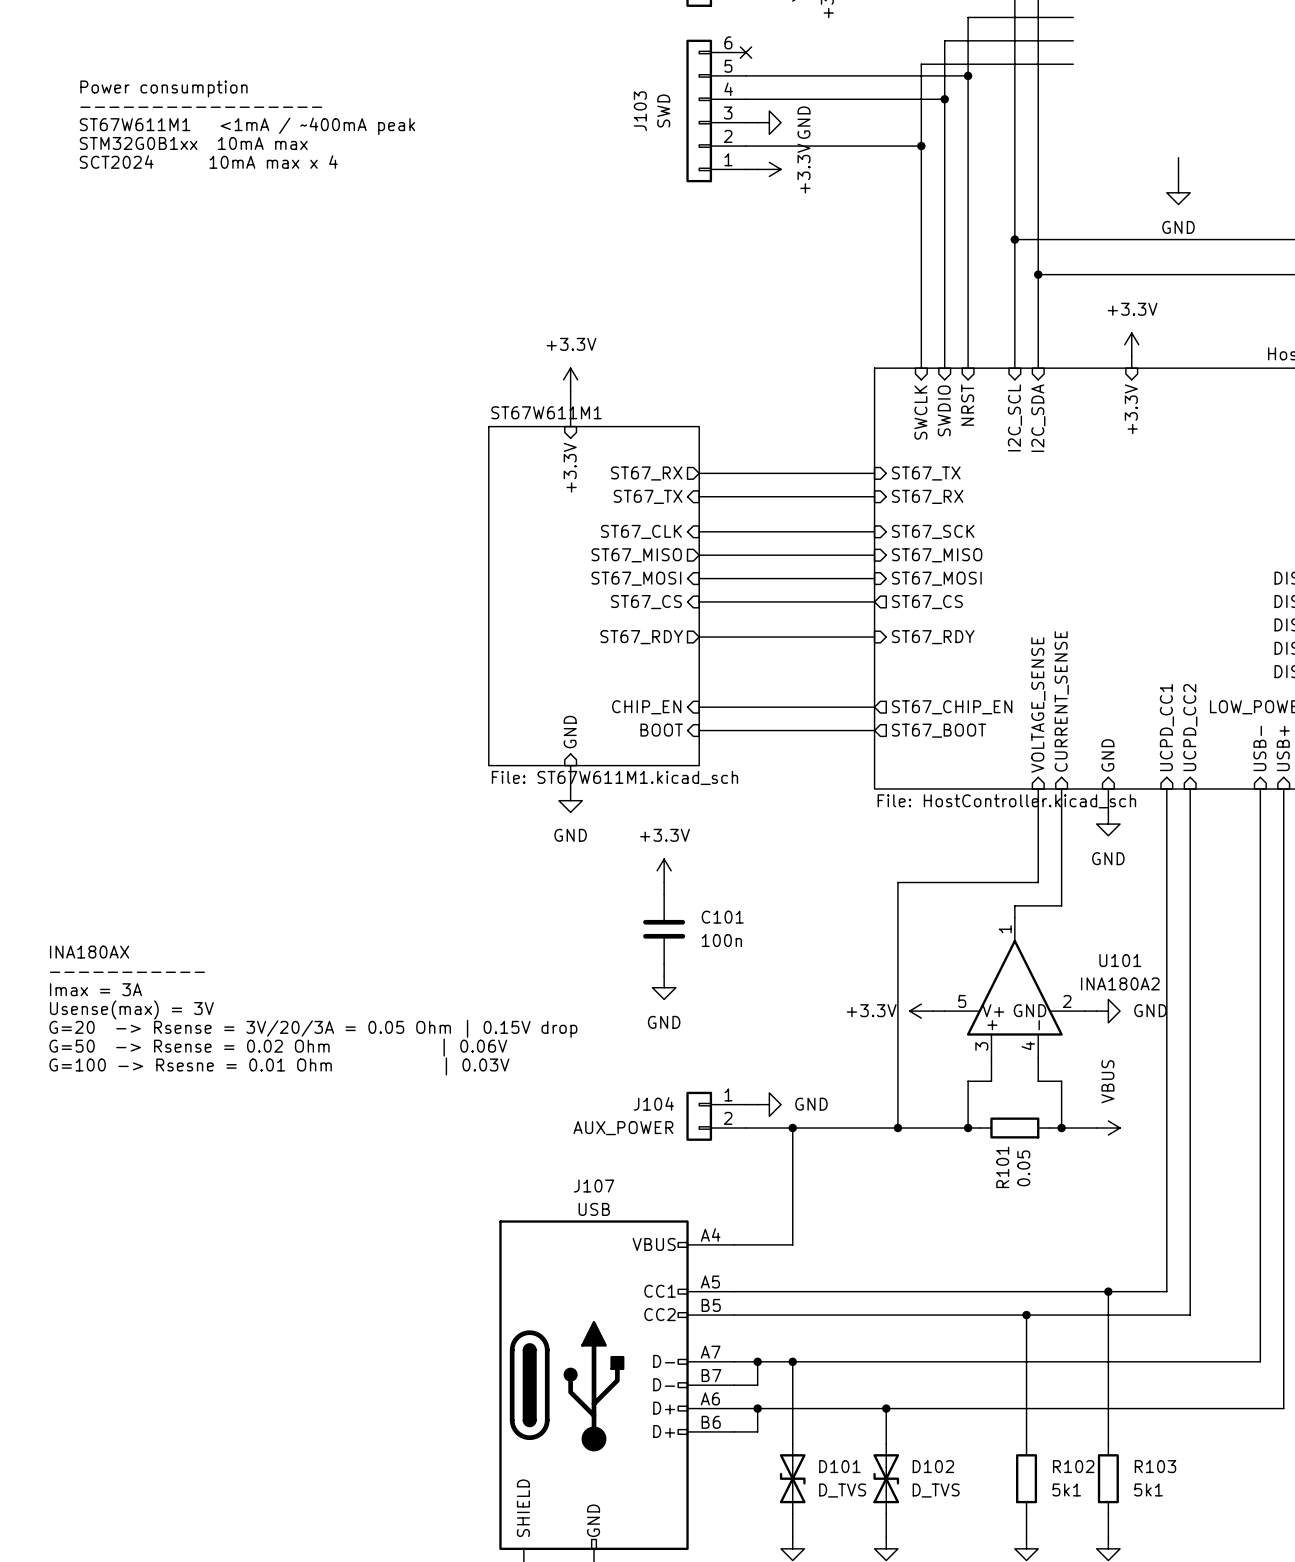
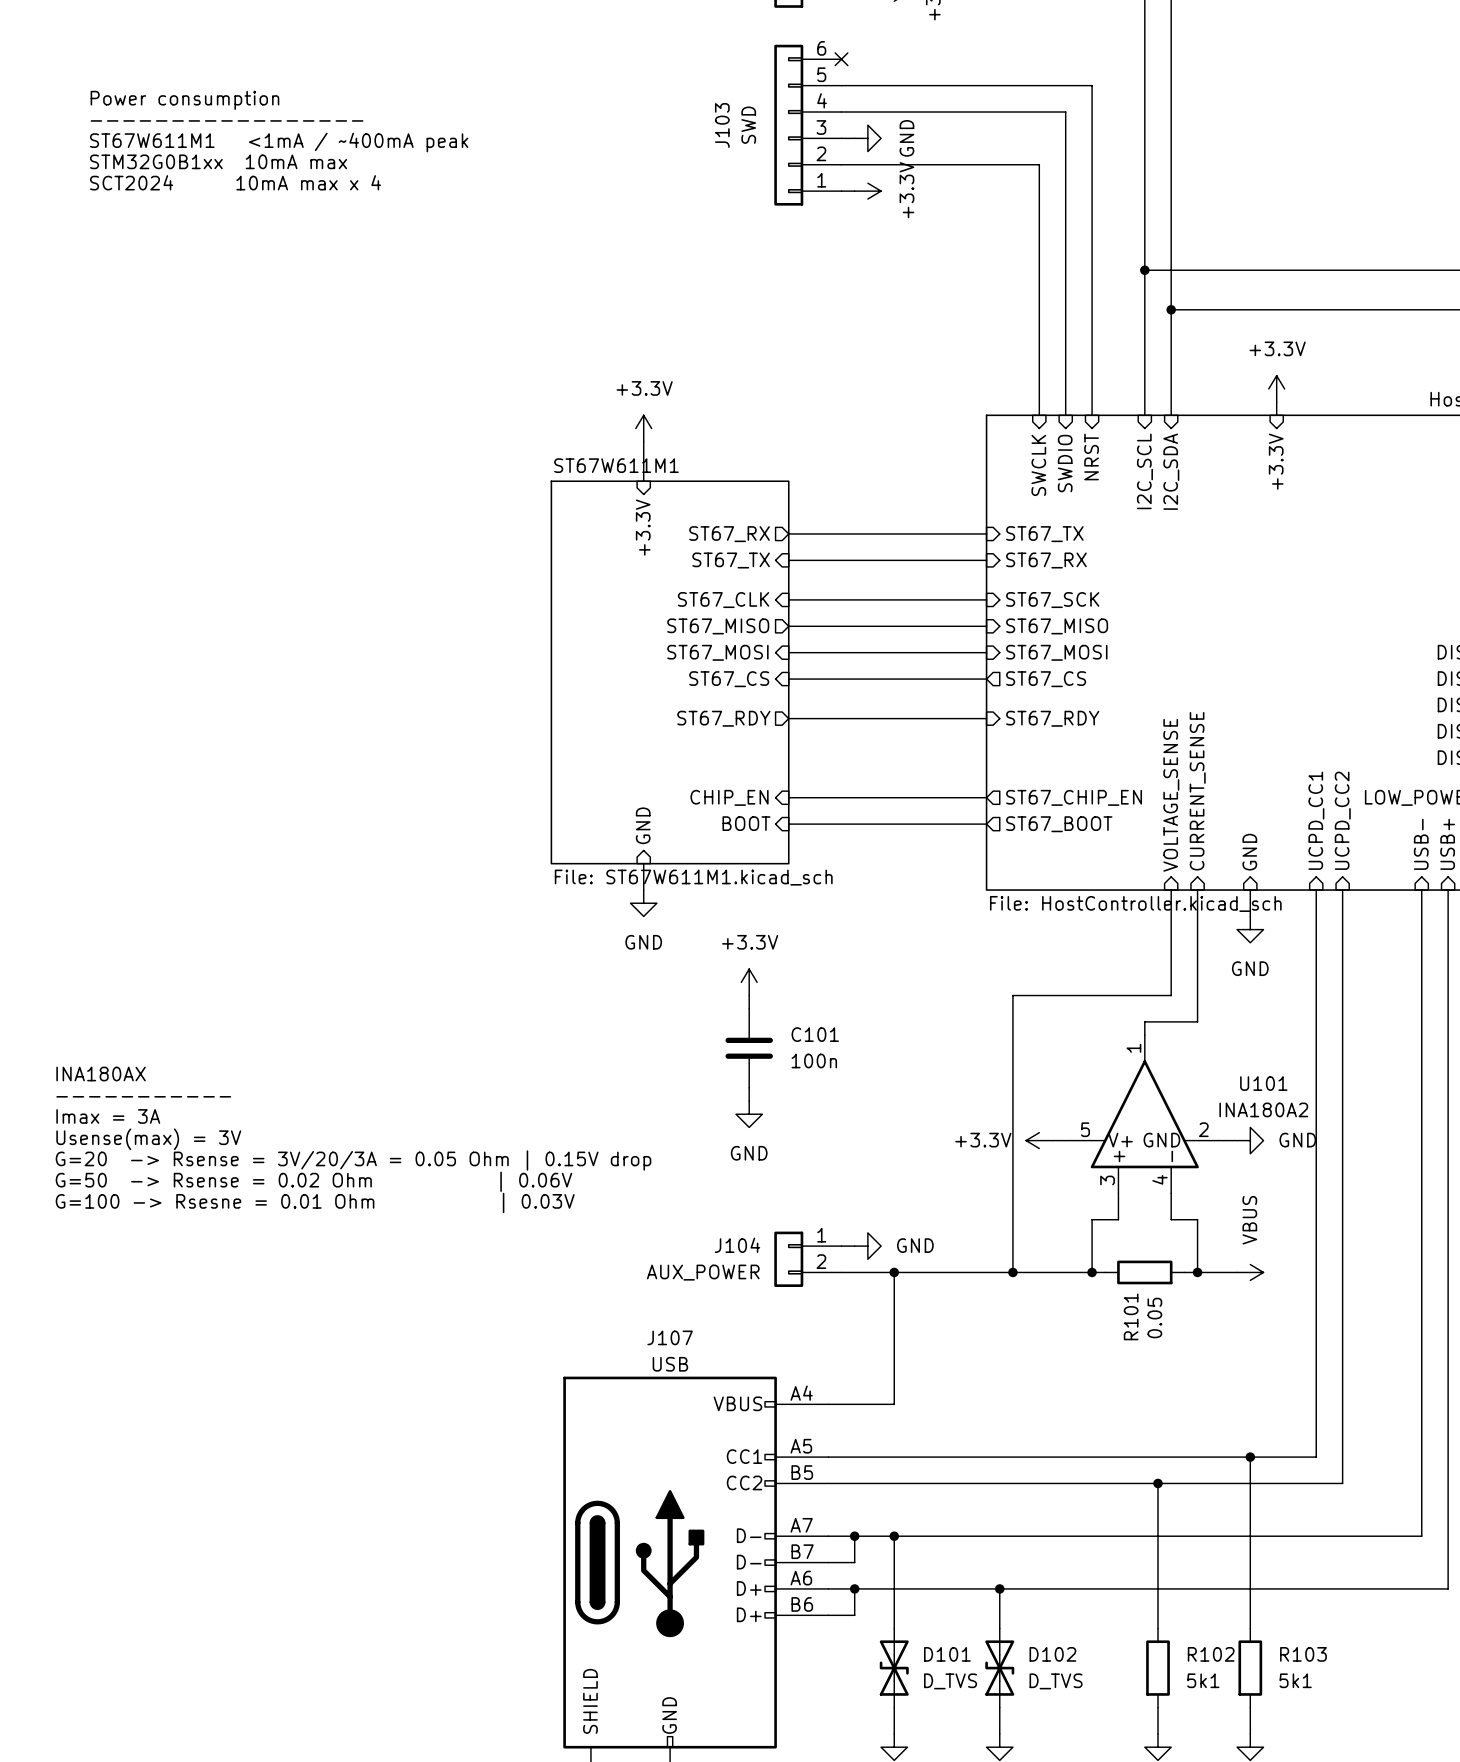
wire: (1073, 17) (968, 17) (968, 75) -> none
wire: (1073, 40) (944, 40) (944, 99) -> none
wire: (1073, 64) (921, 64) (921, 146) -> none
junction: (968, 75) -> none
junction: (944, 99) -> none
junction: (921, 146) -> none
wire: (1178, 157) (1178, 181) -> none
power symbol: GND (1178, 192) -> none

